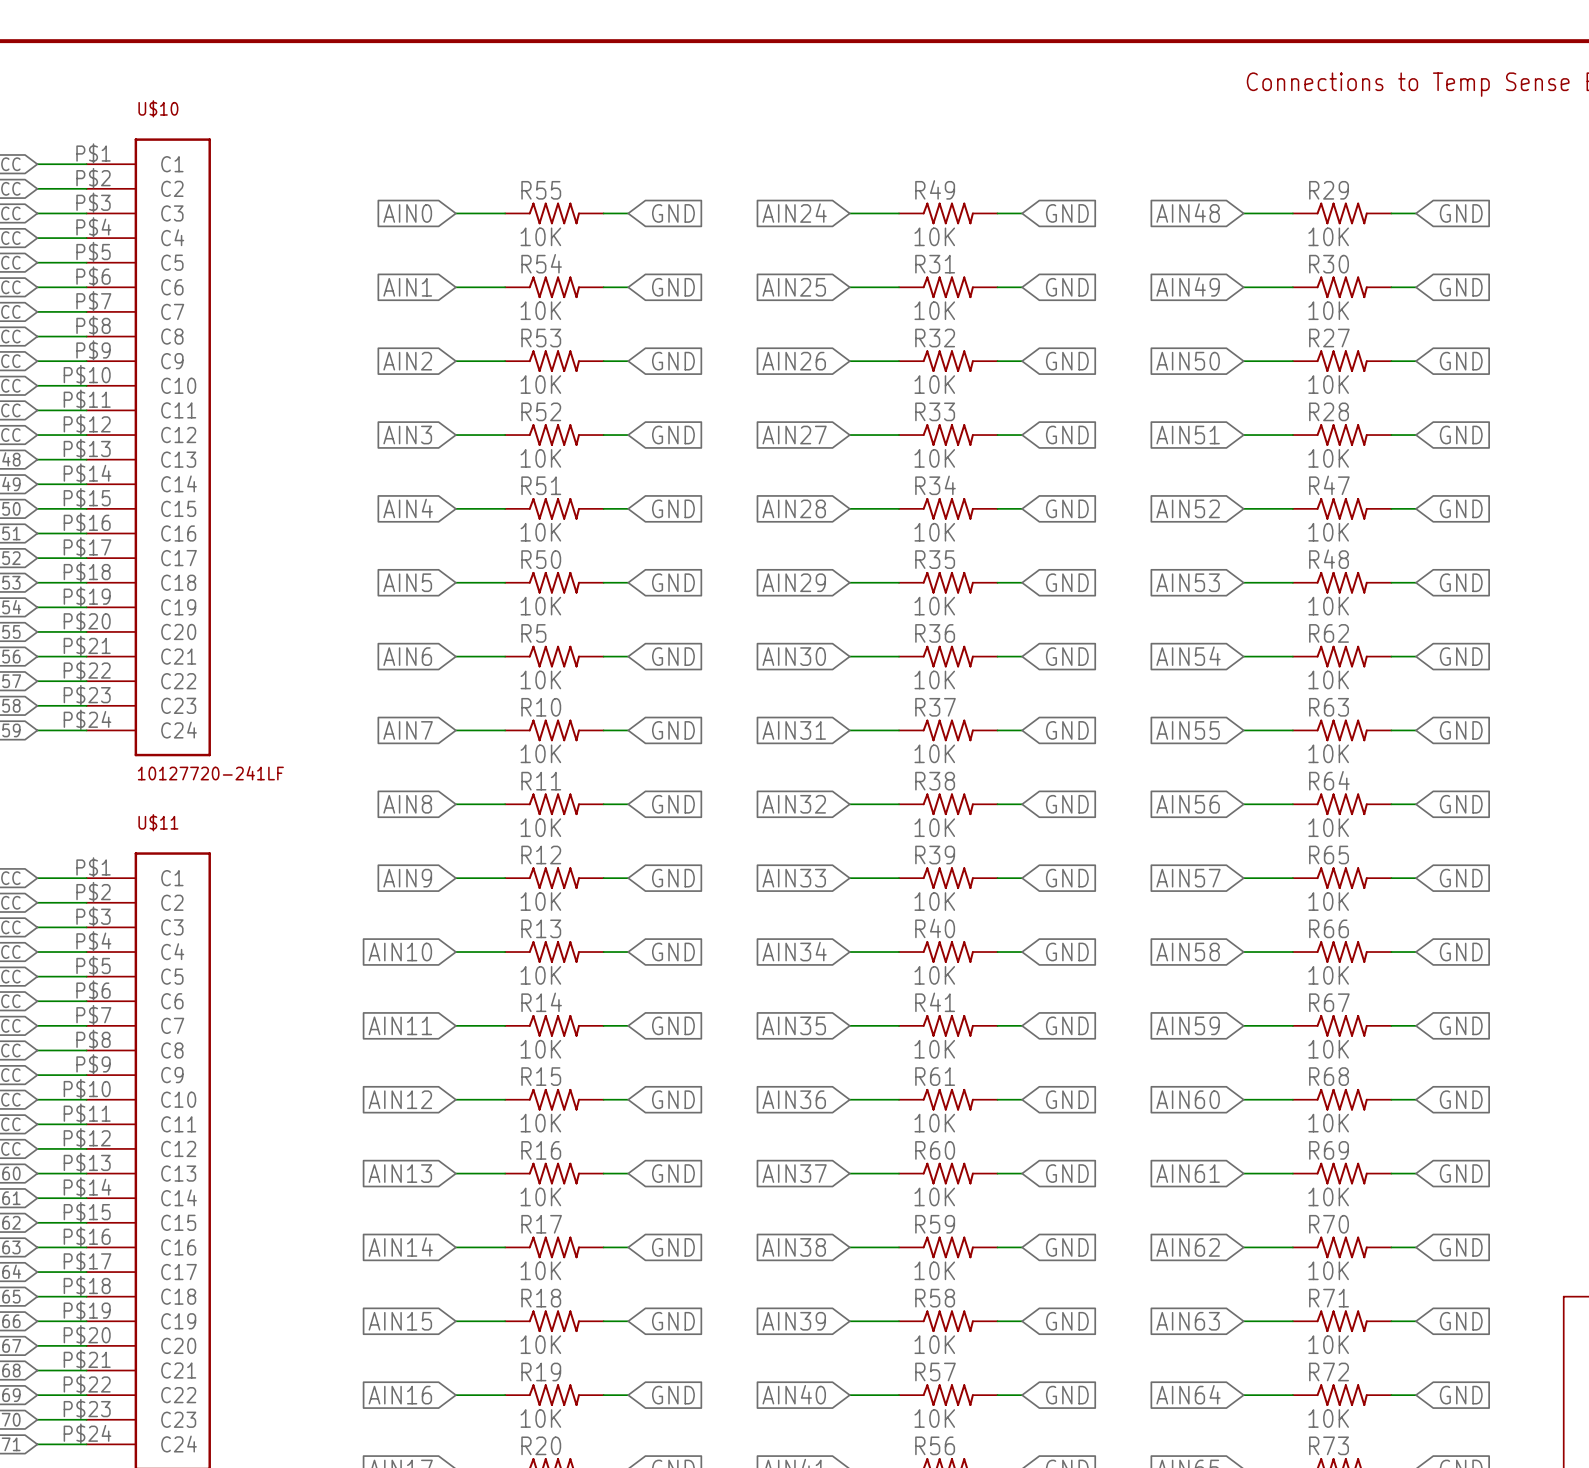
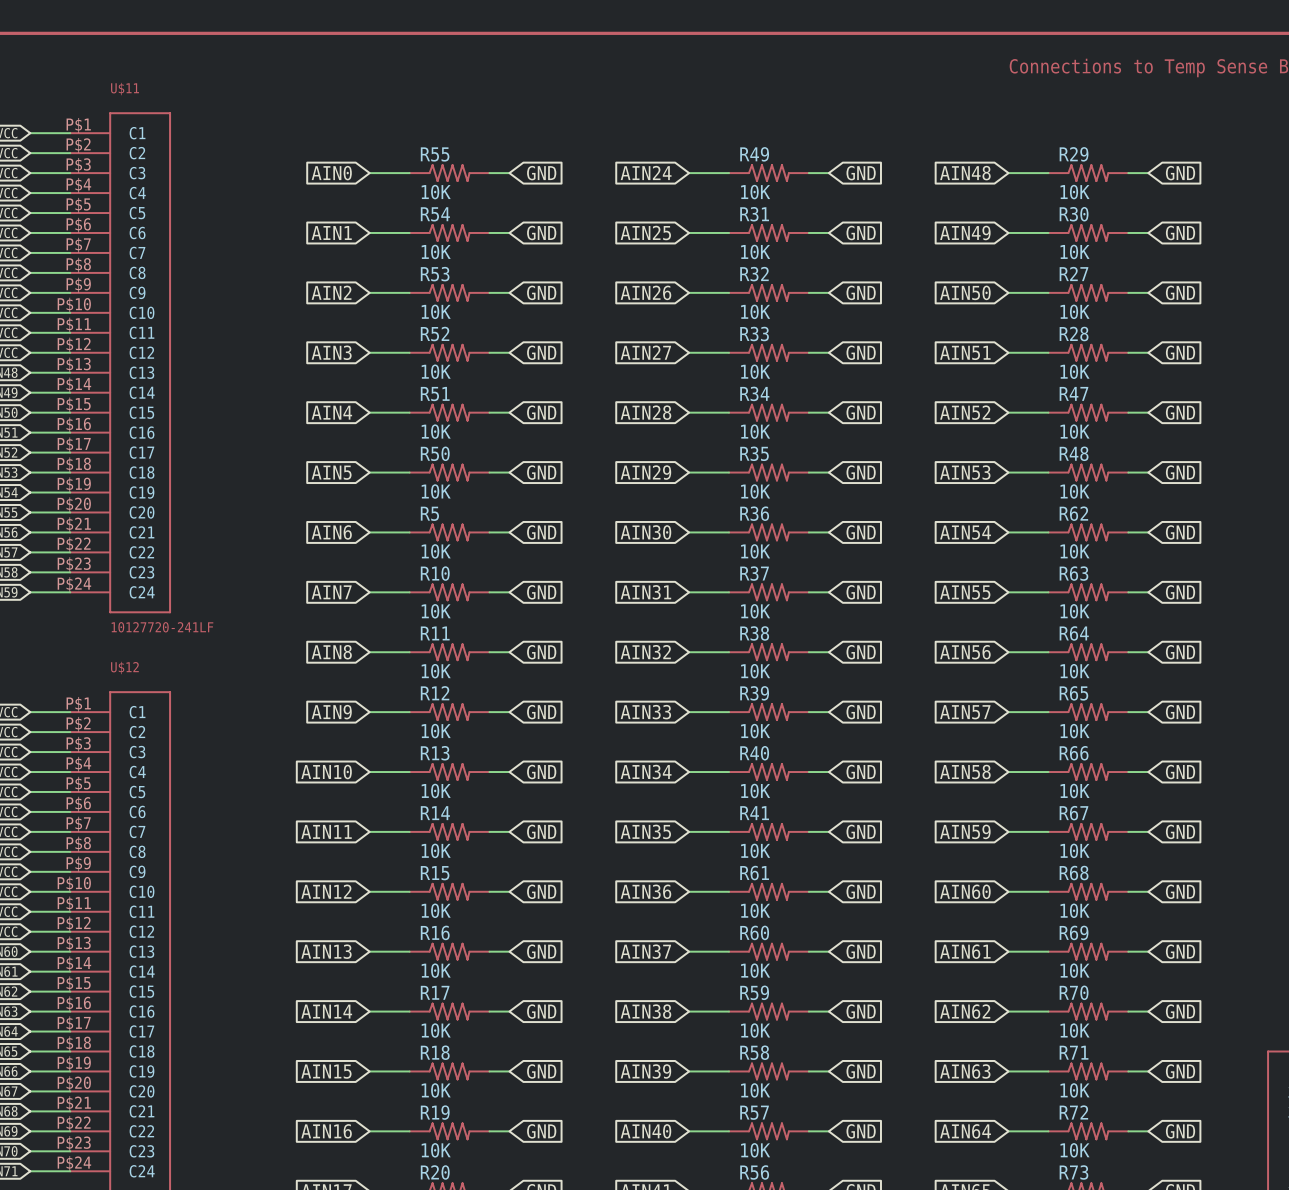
U$10 name: U$10 (158, 108) -> U$11 (125, 89)
U$11 name: U$11 (158, 822) -> U$12 (124, 667)

